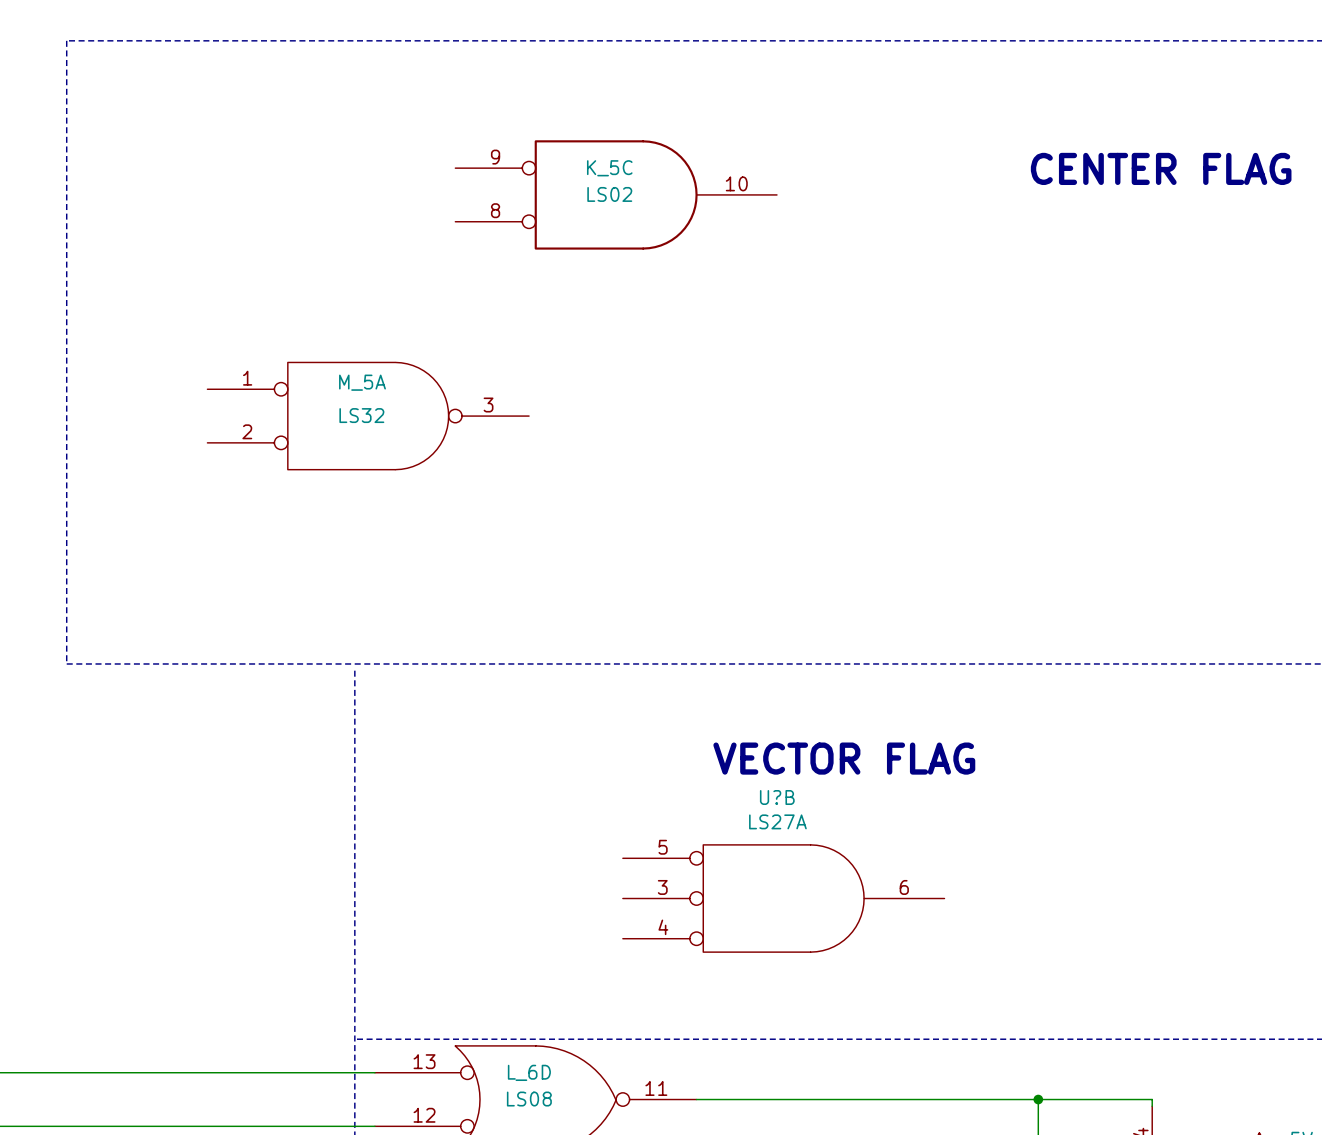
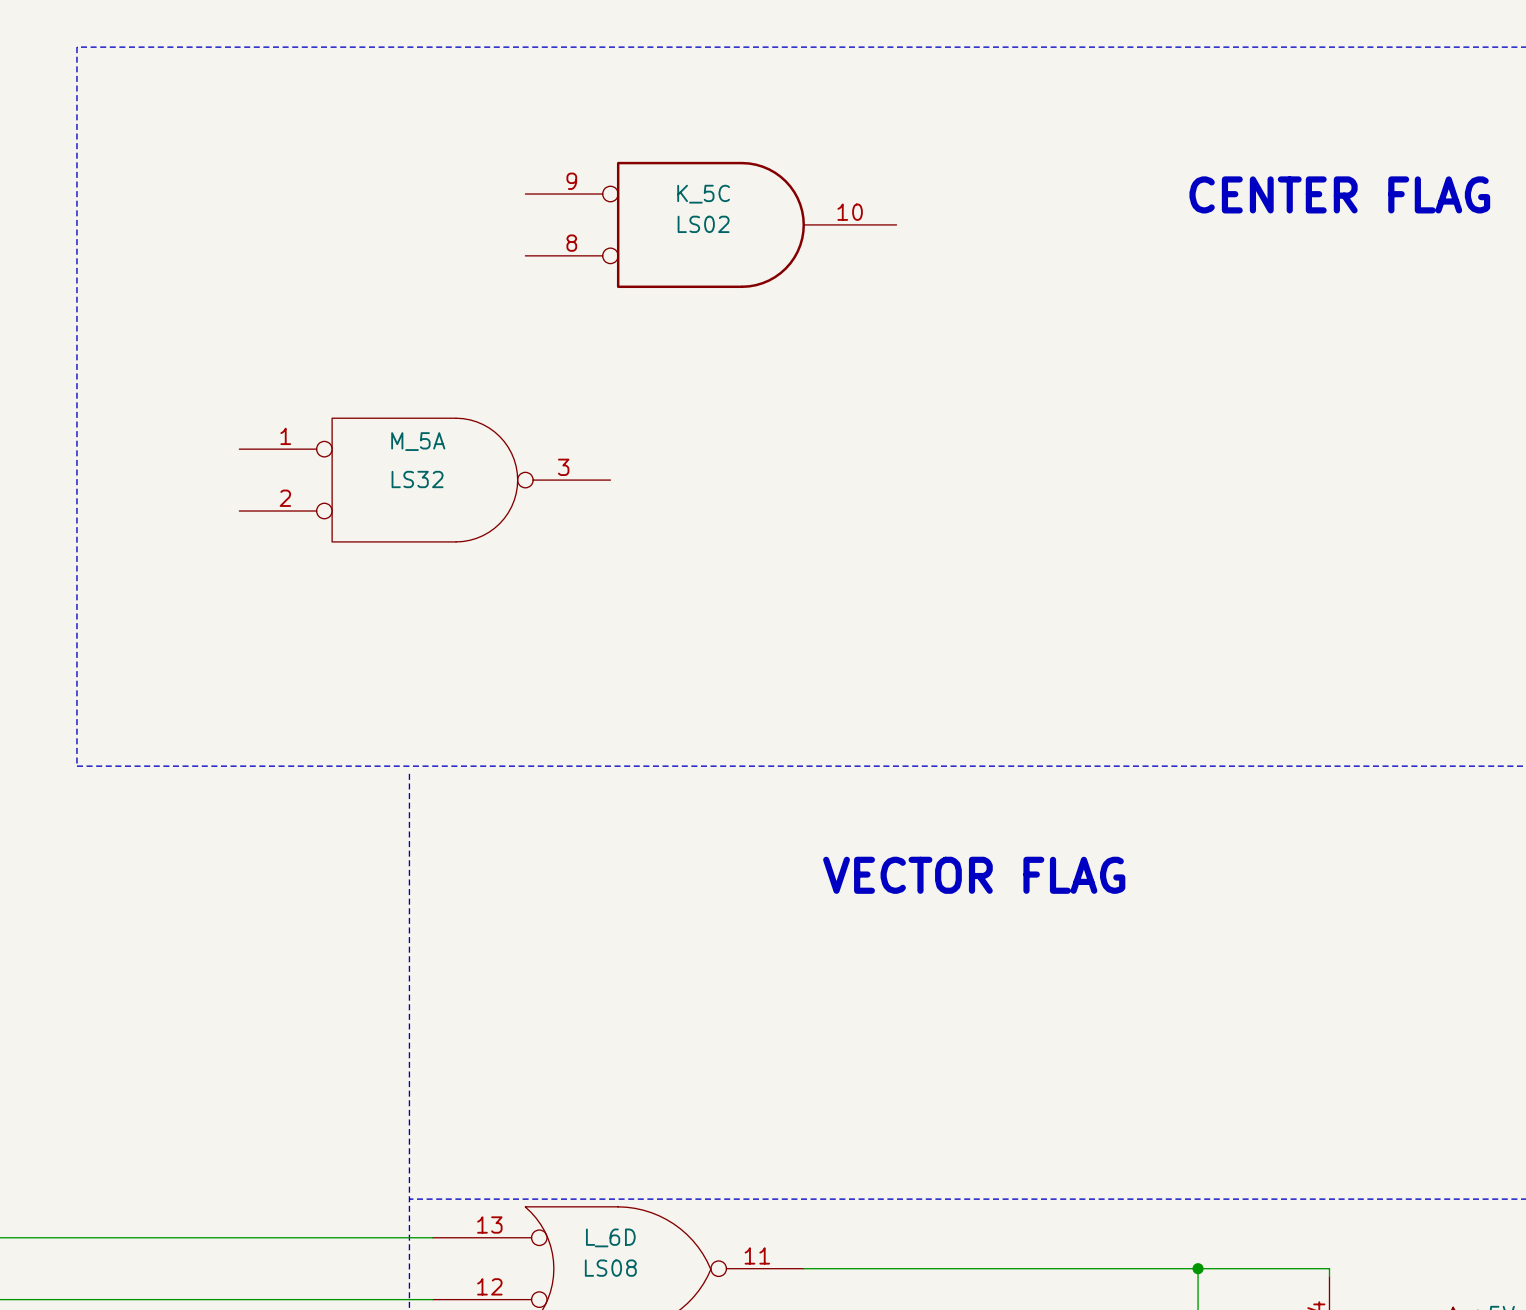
U?B: LS27A (783, 898) -> none

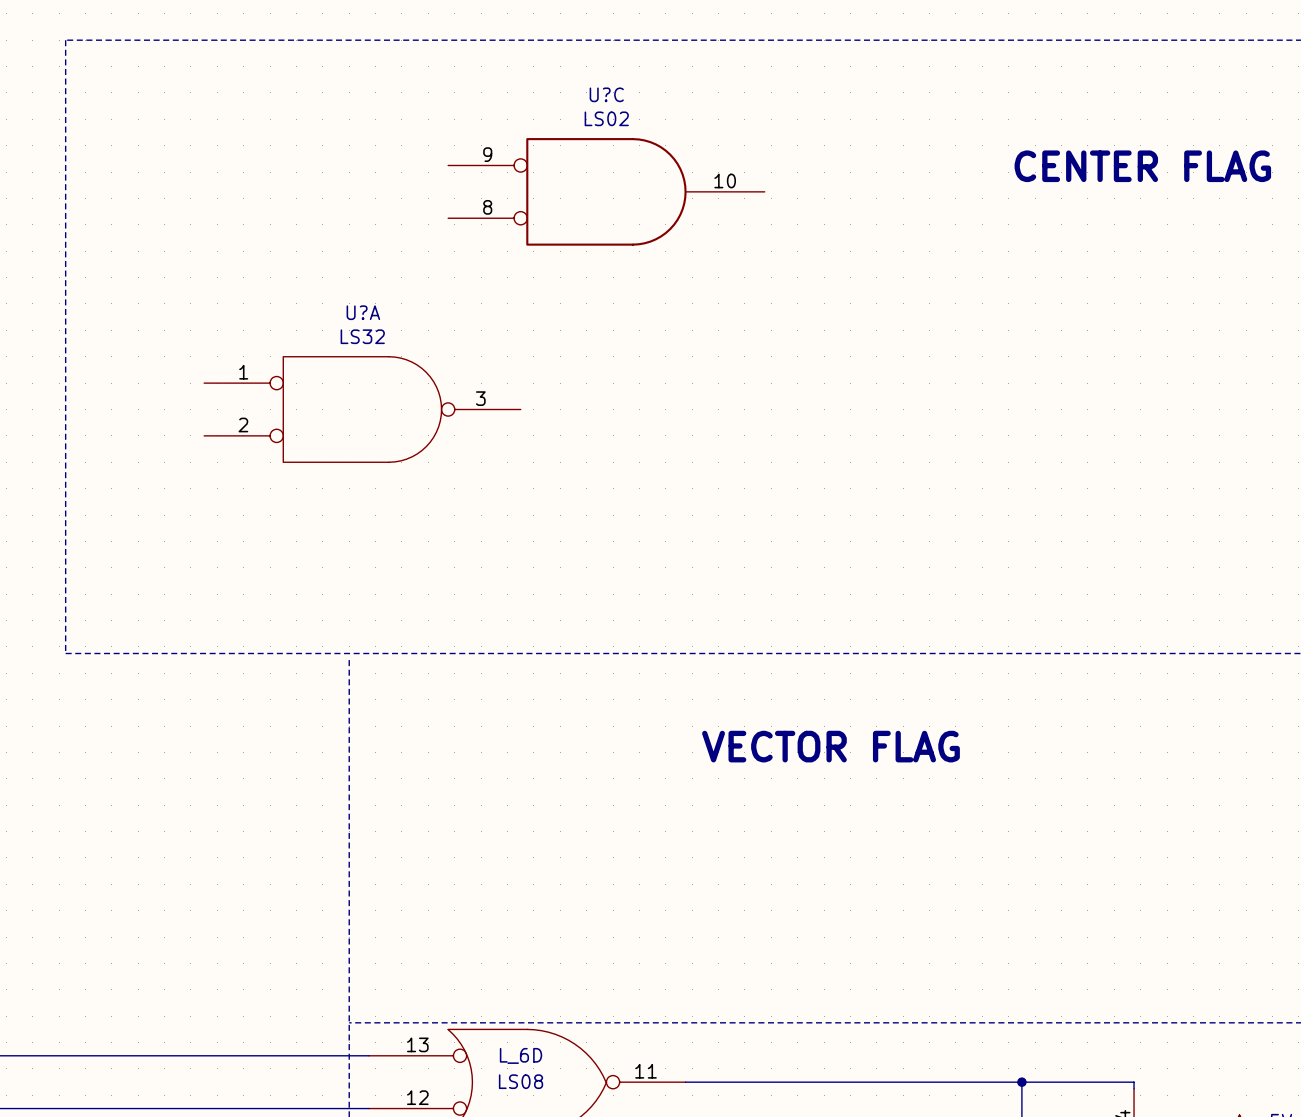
K_5C name: K_5C (703, 194) -> U?C (606, 94)
K_5C value position: LS02 (703, 224) -> LS02 (606, 118)
M_5A name: M_5A (418, 441) -> U?A (363, 312)
M_5A value position: LS32 (417, 479) -> LS32 (362, 336)

